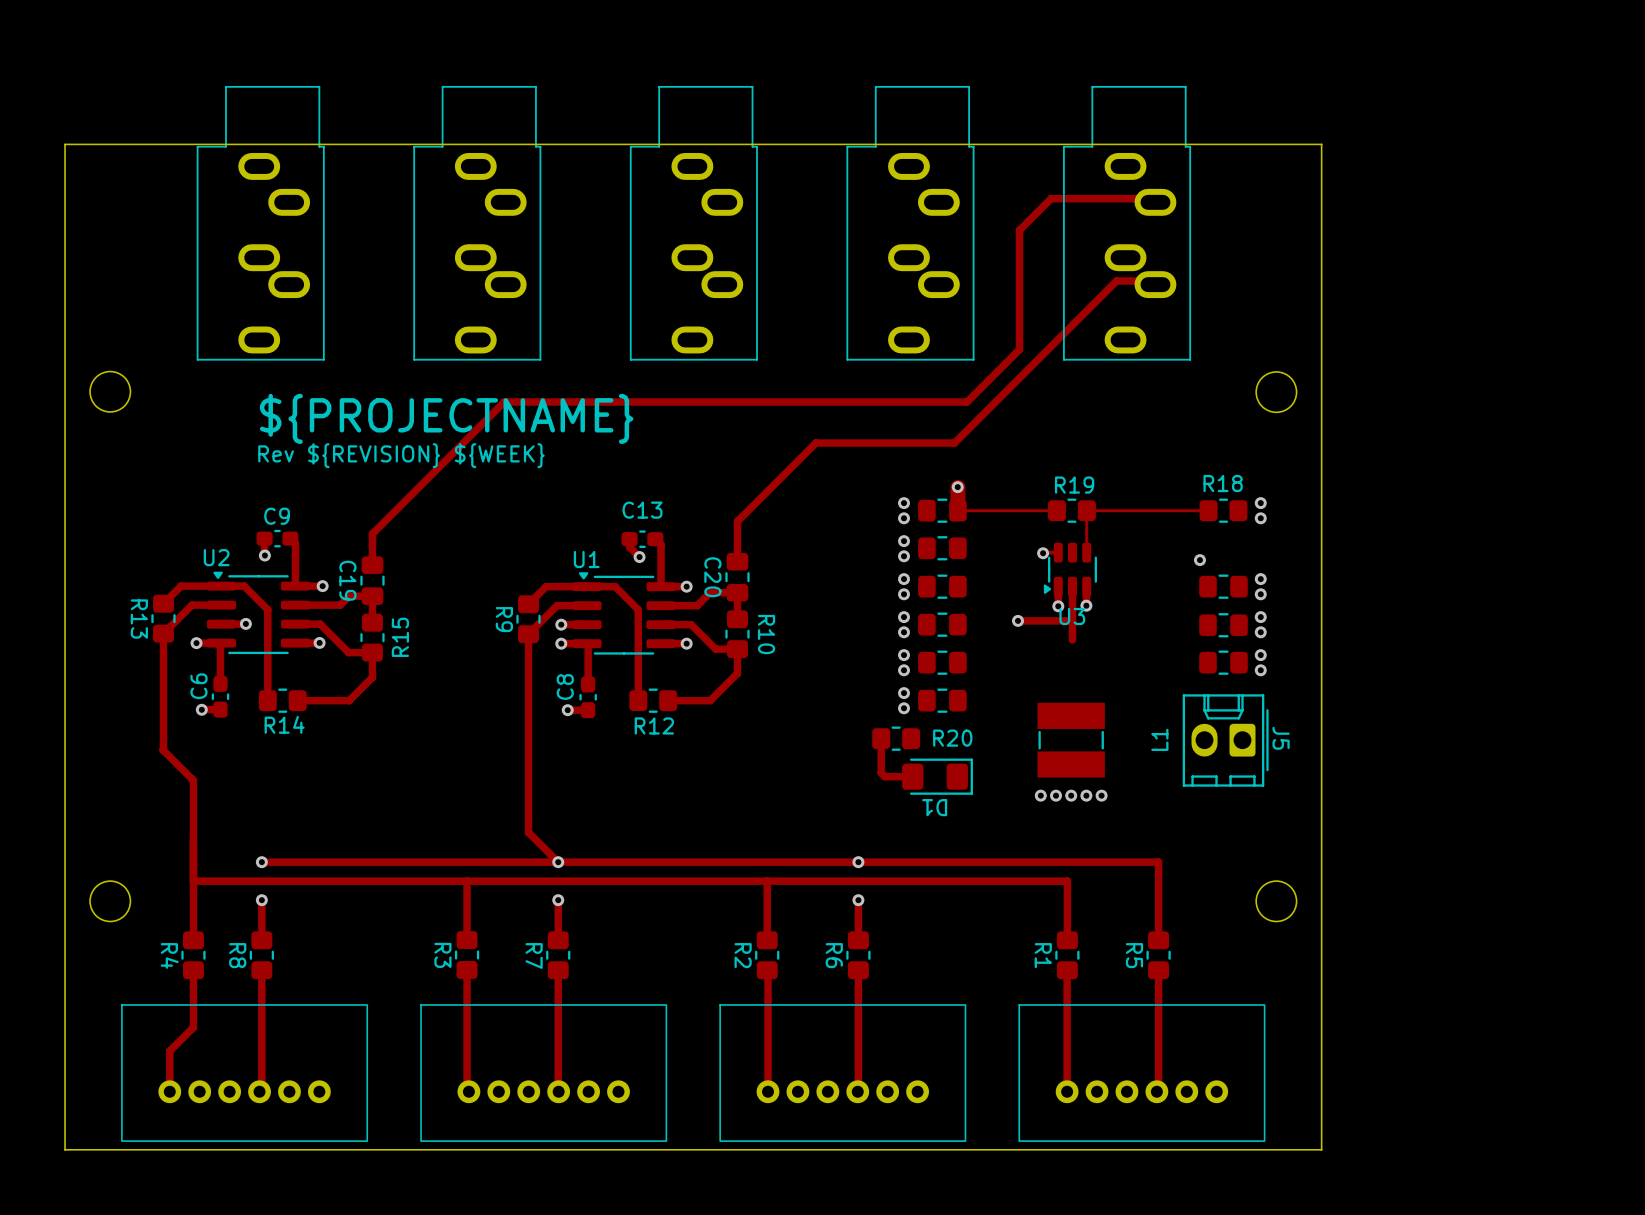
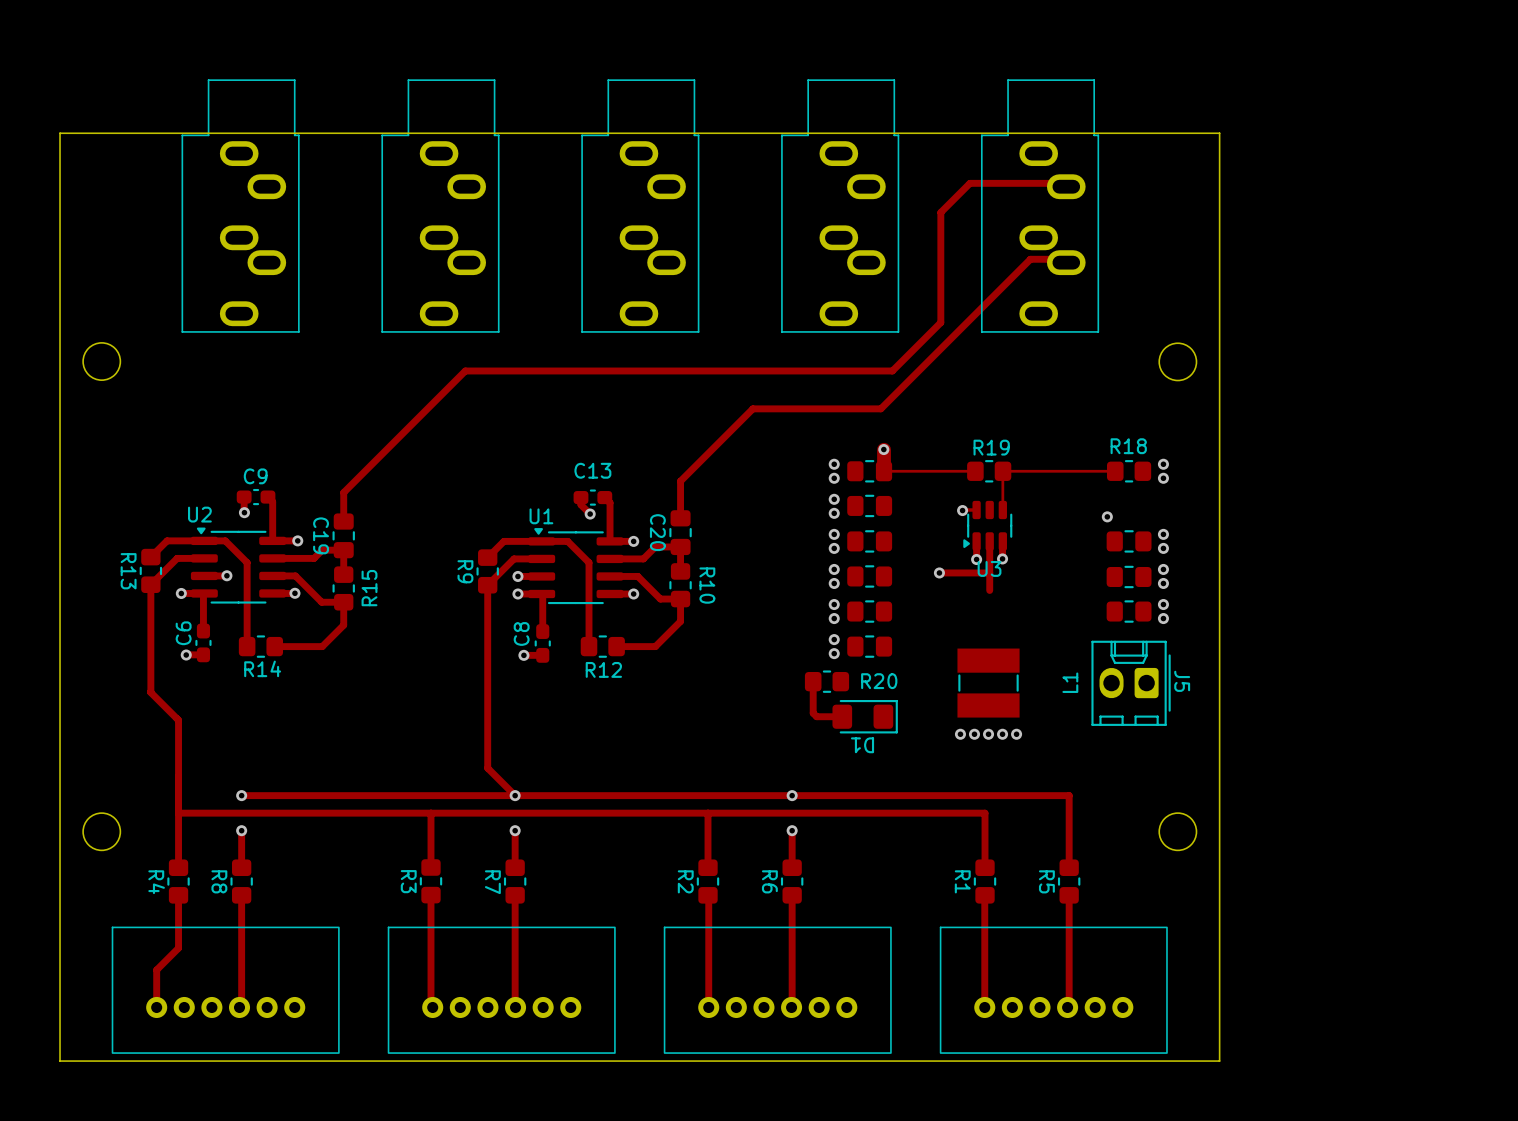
text: ${PROJECTNAME} (446, 418) -> none
text: Rev ${REVISION} ${WEEK} (401, 455) -> none

